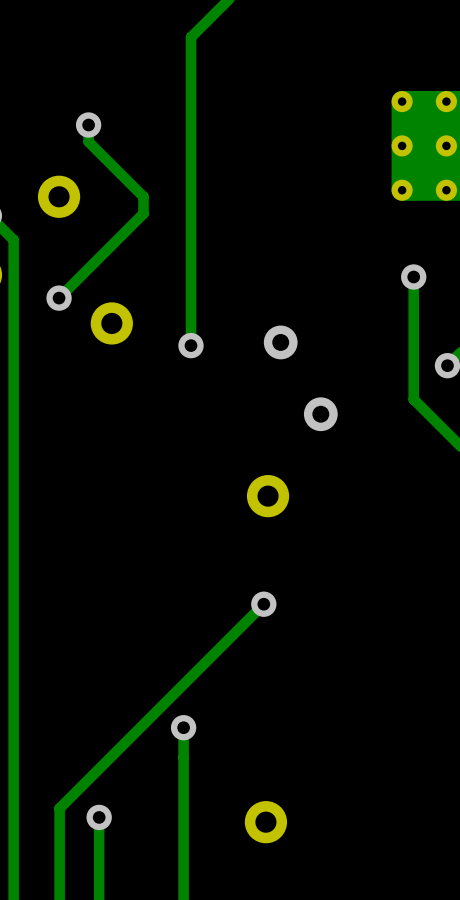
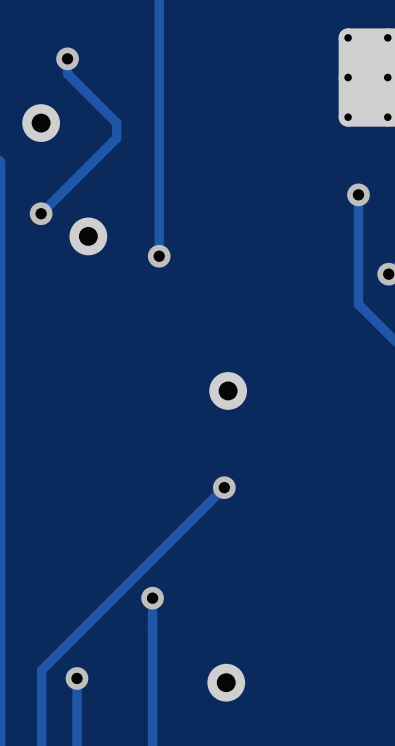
via: (280, 342) -> none
via: (320, 414) -> none

